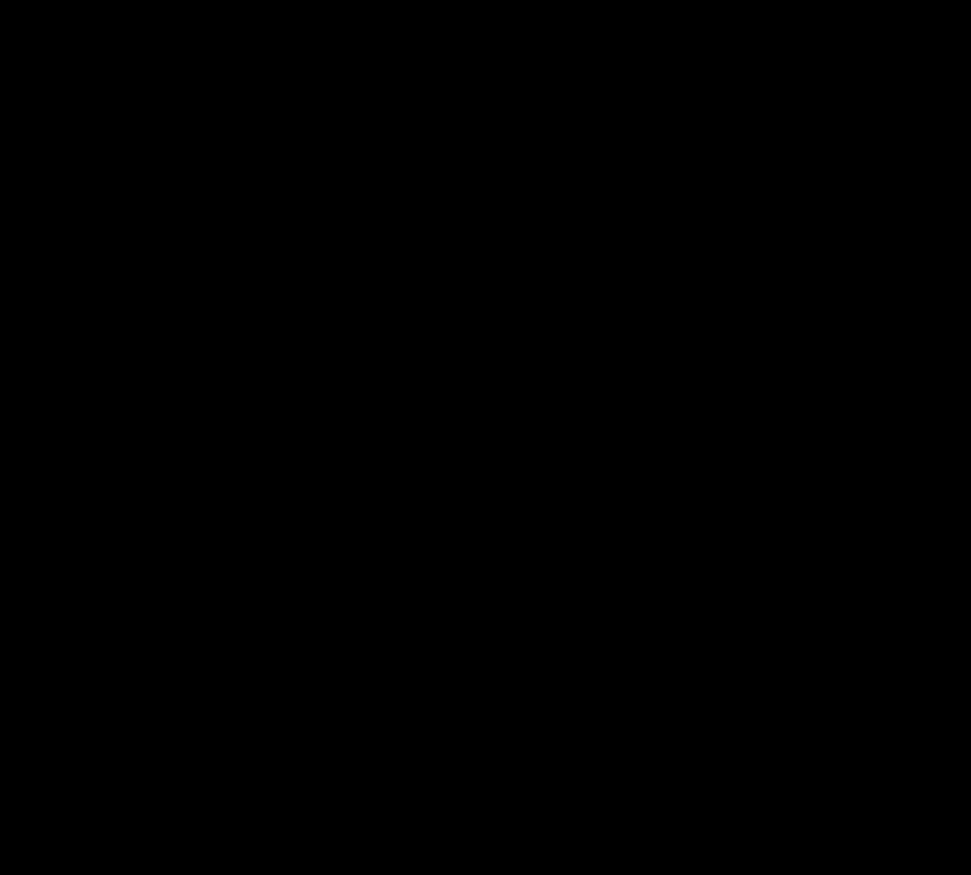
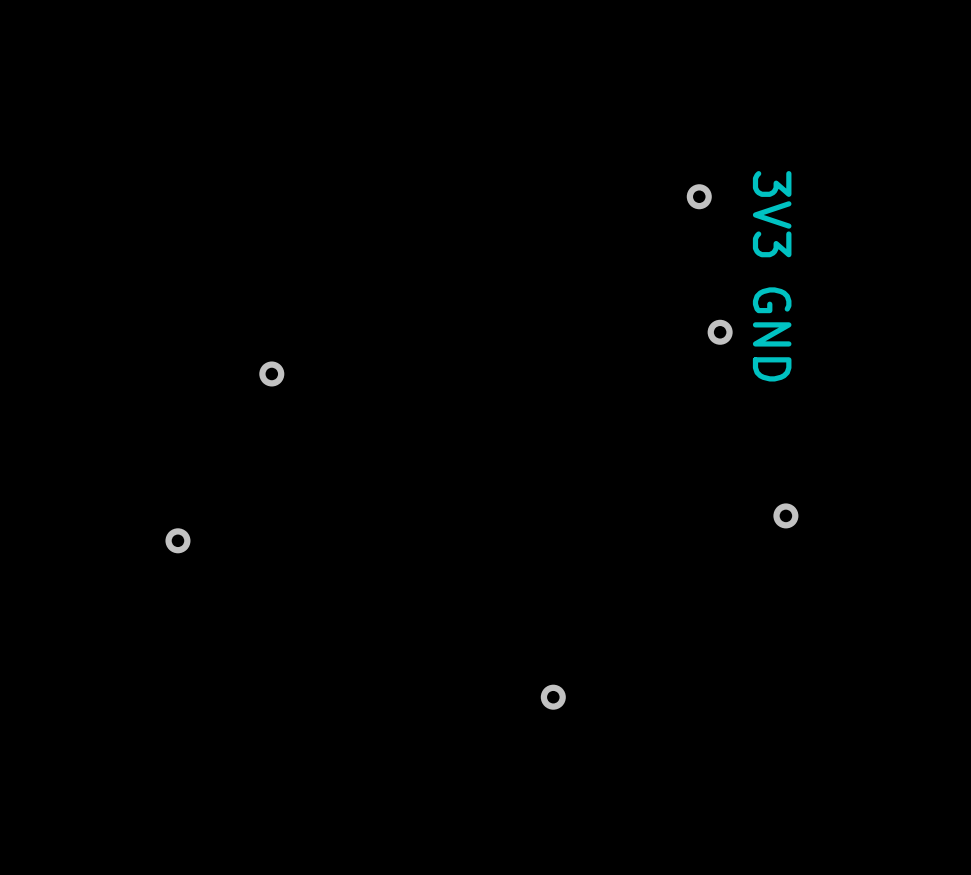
via: none -> (699, 196)
text: none -> 3V3 (772, 214)
via: none -> (720, 332)
text: none -> GND (772, 334)
via: none -> (271, 373)
via: none -> (785, 515)
via: none -> (177, 540)
via: none -> (553, 697)

